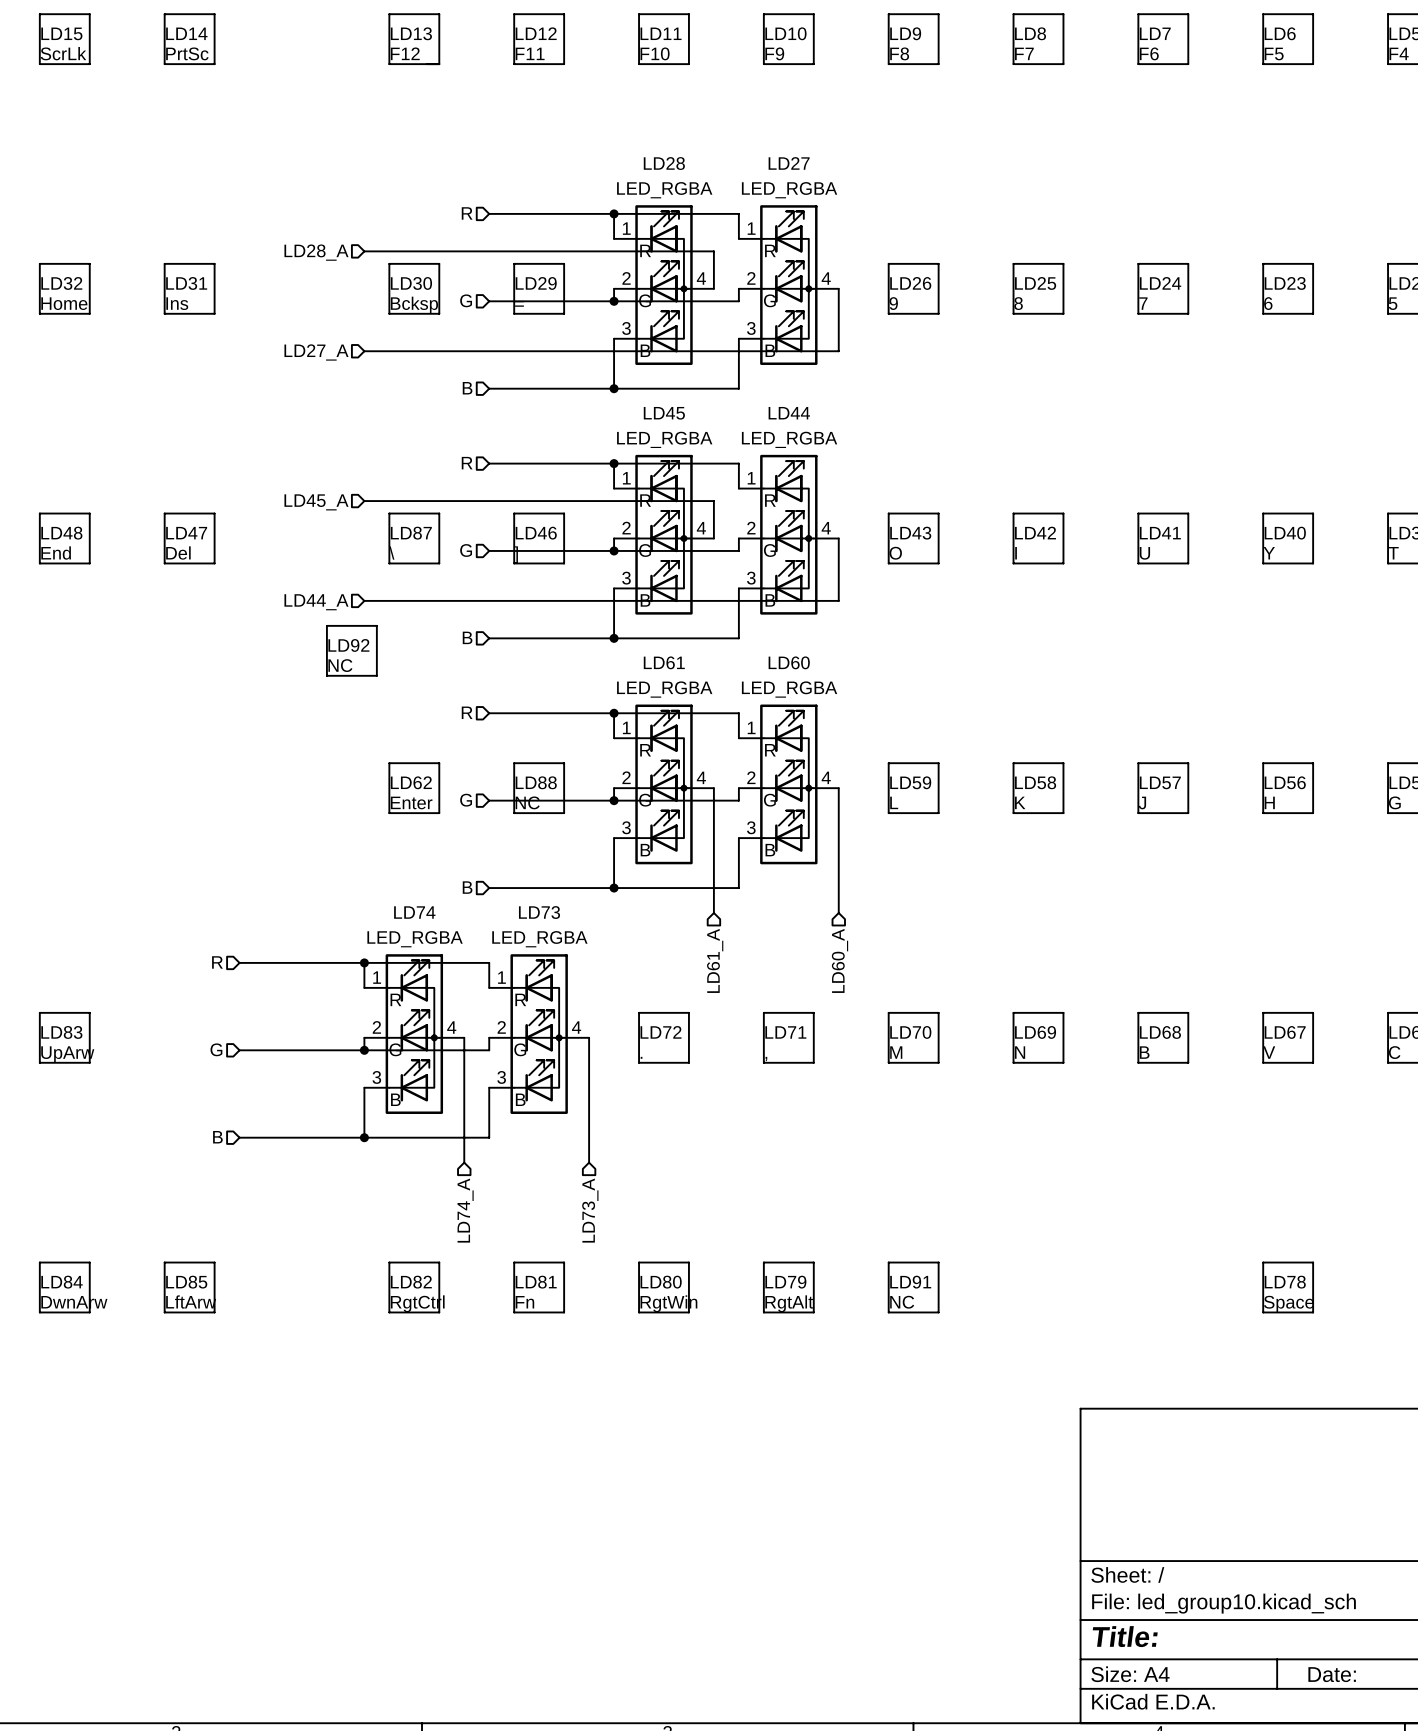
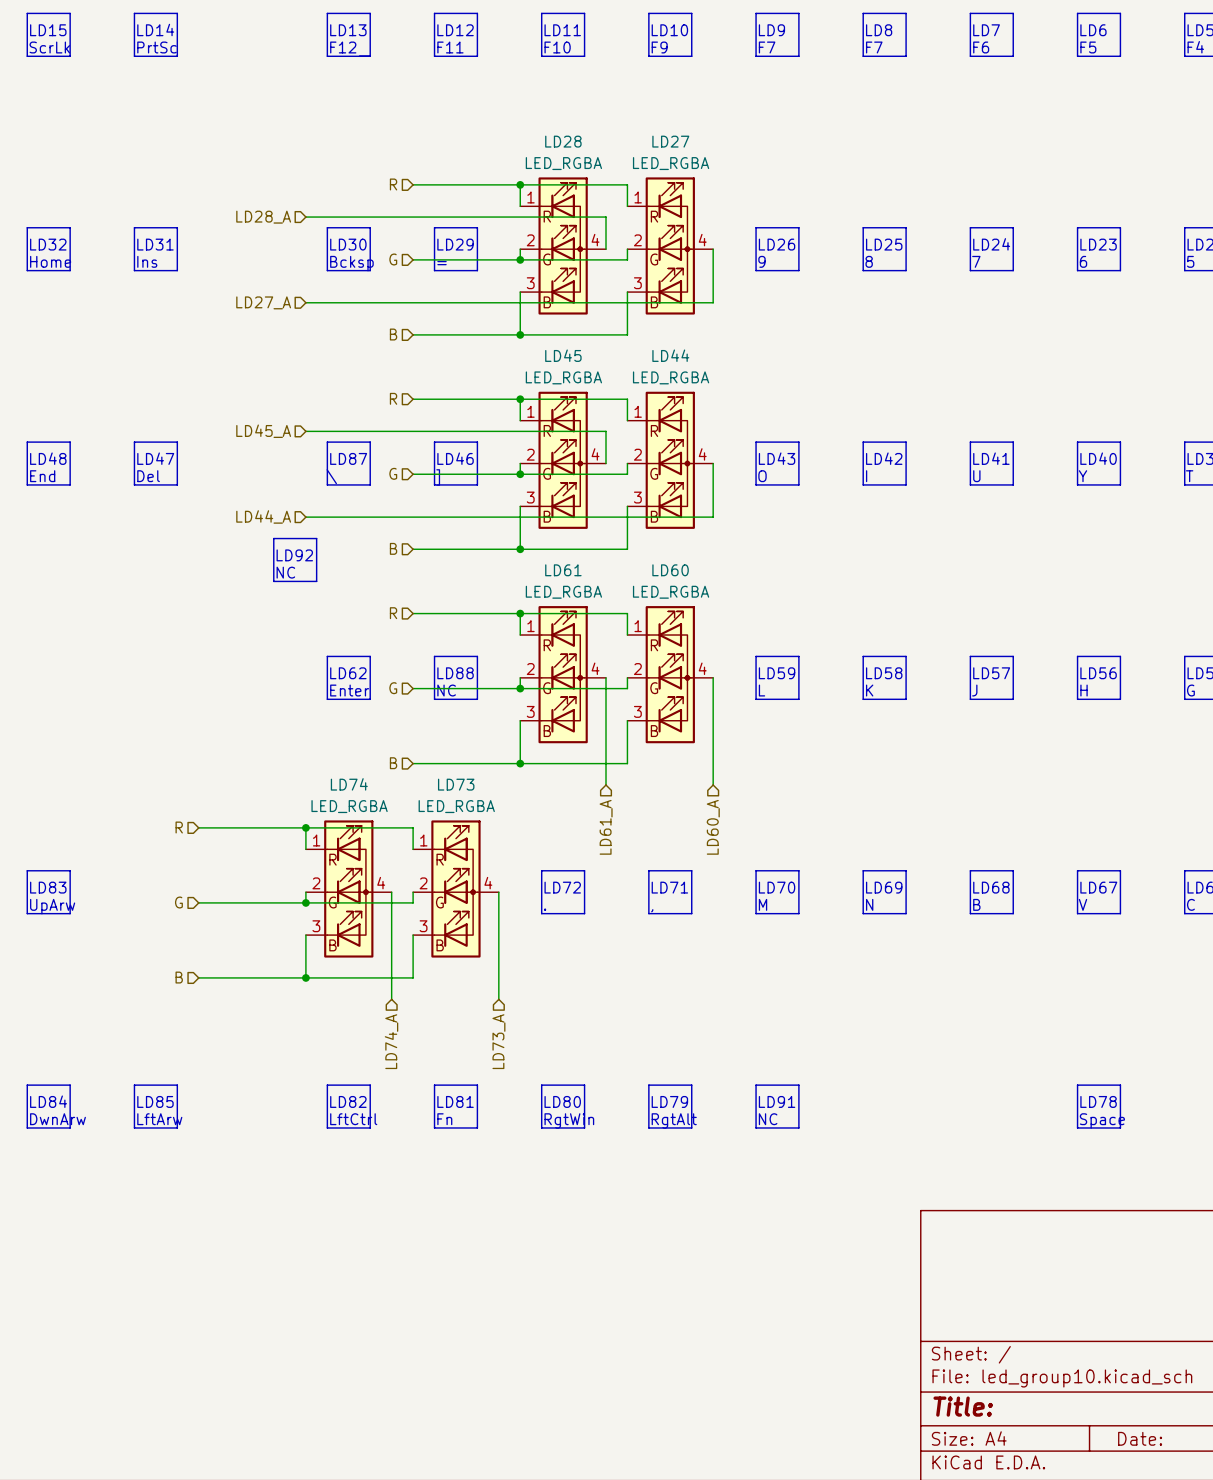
text: F8 (899, 53) -> F7 (767, 47)
text: RgtCtrl (417, 1303) -> LftCtrl (353, 1119)

